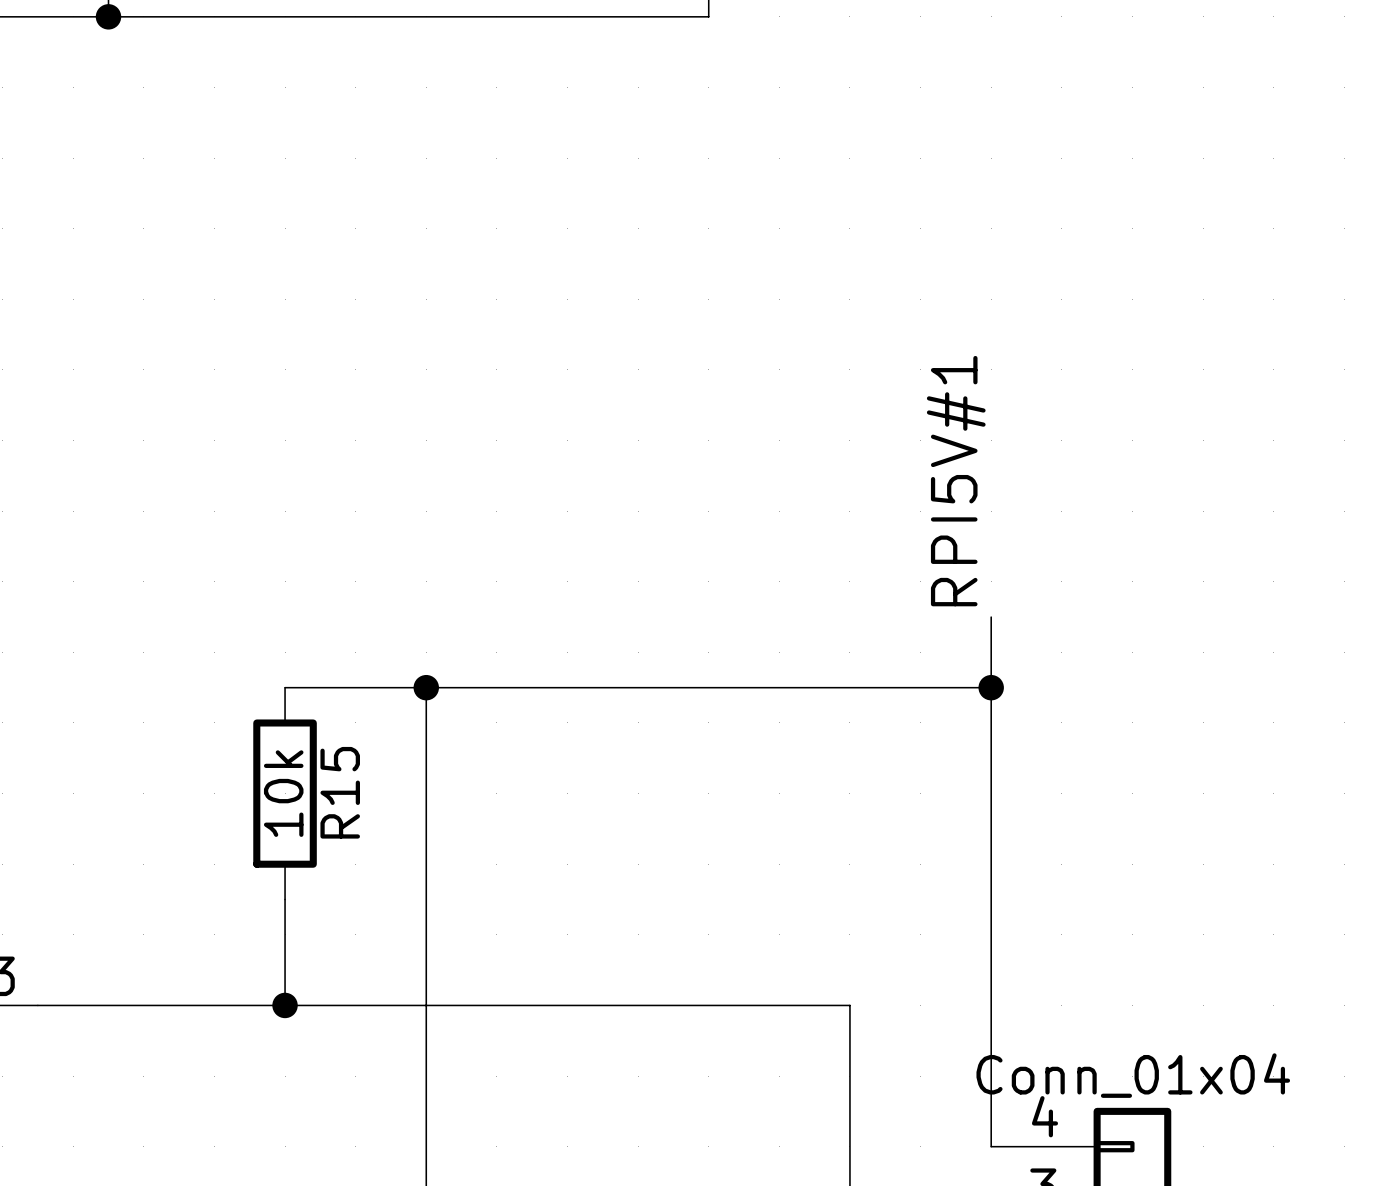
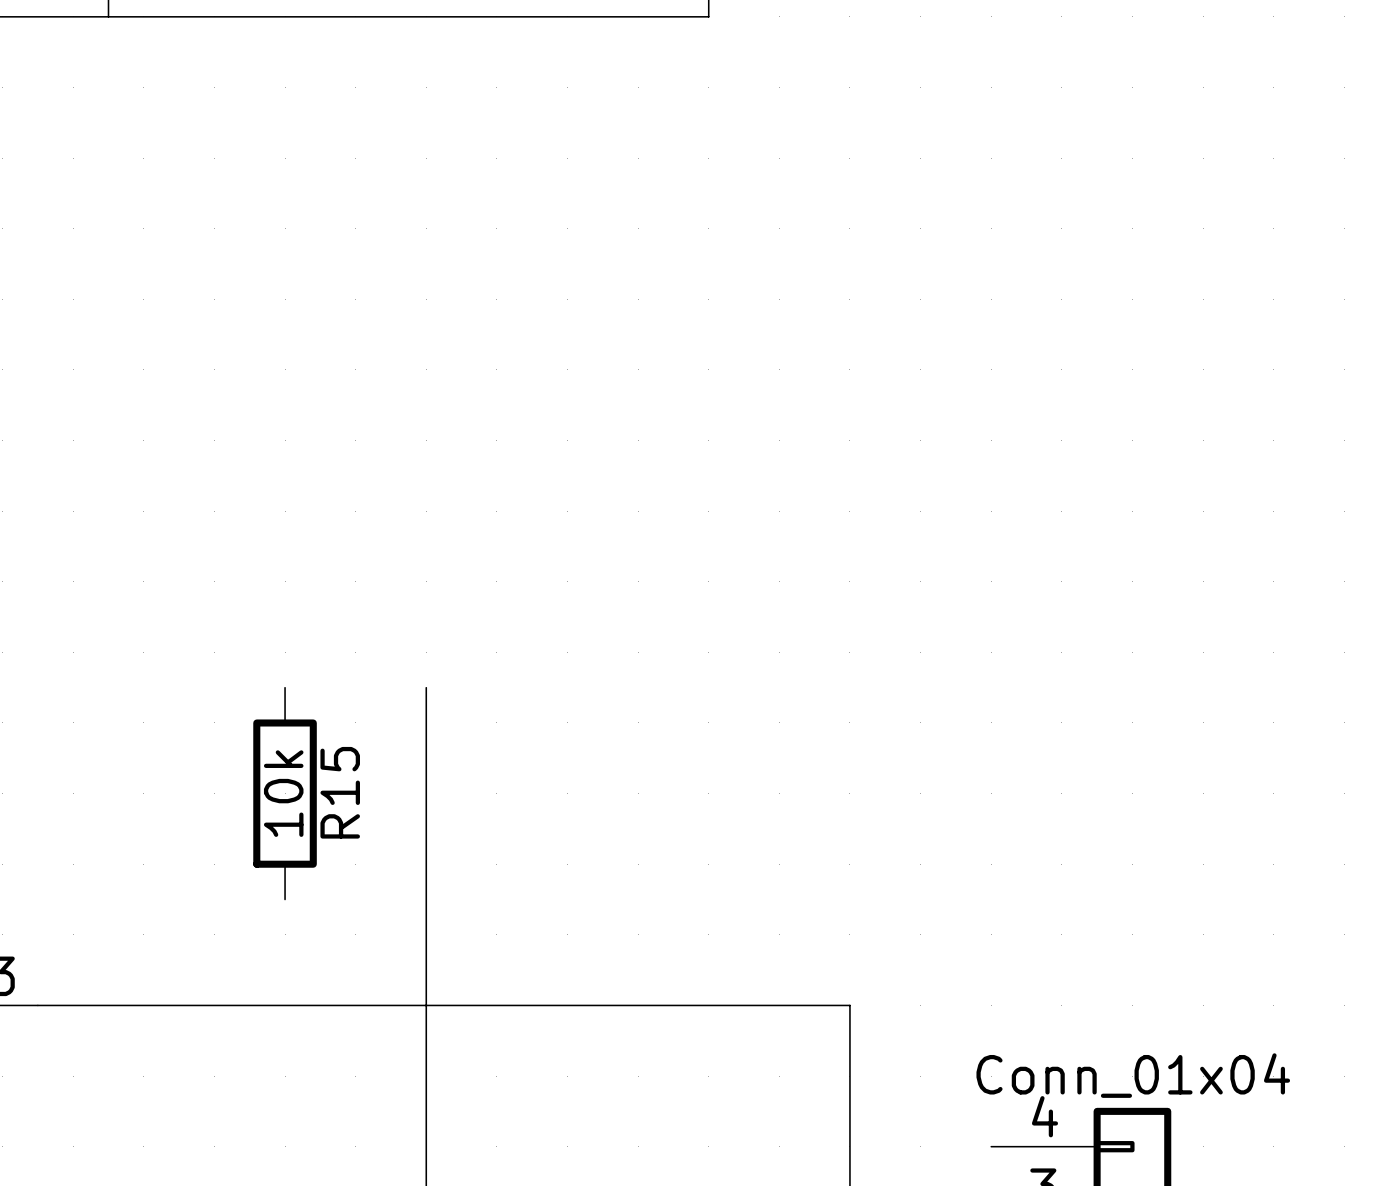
junction: (108, 16) -> none
label: RPI5V#1 (956, 481) -> none
wire: (991, 617) (991, 1146) -> none
wire: (285, 687) (991, 687) -> none
junction: (426, 687) -> none
junction: (991, 687) -> none
wire: (285, 899) (285, 1005) -> none
junction: (285, 1005) -> none

